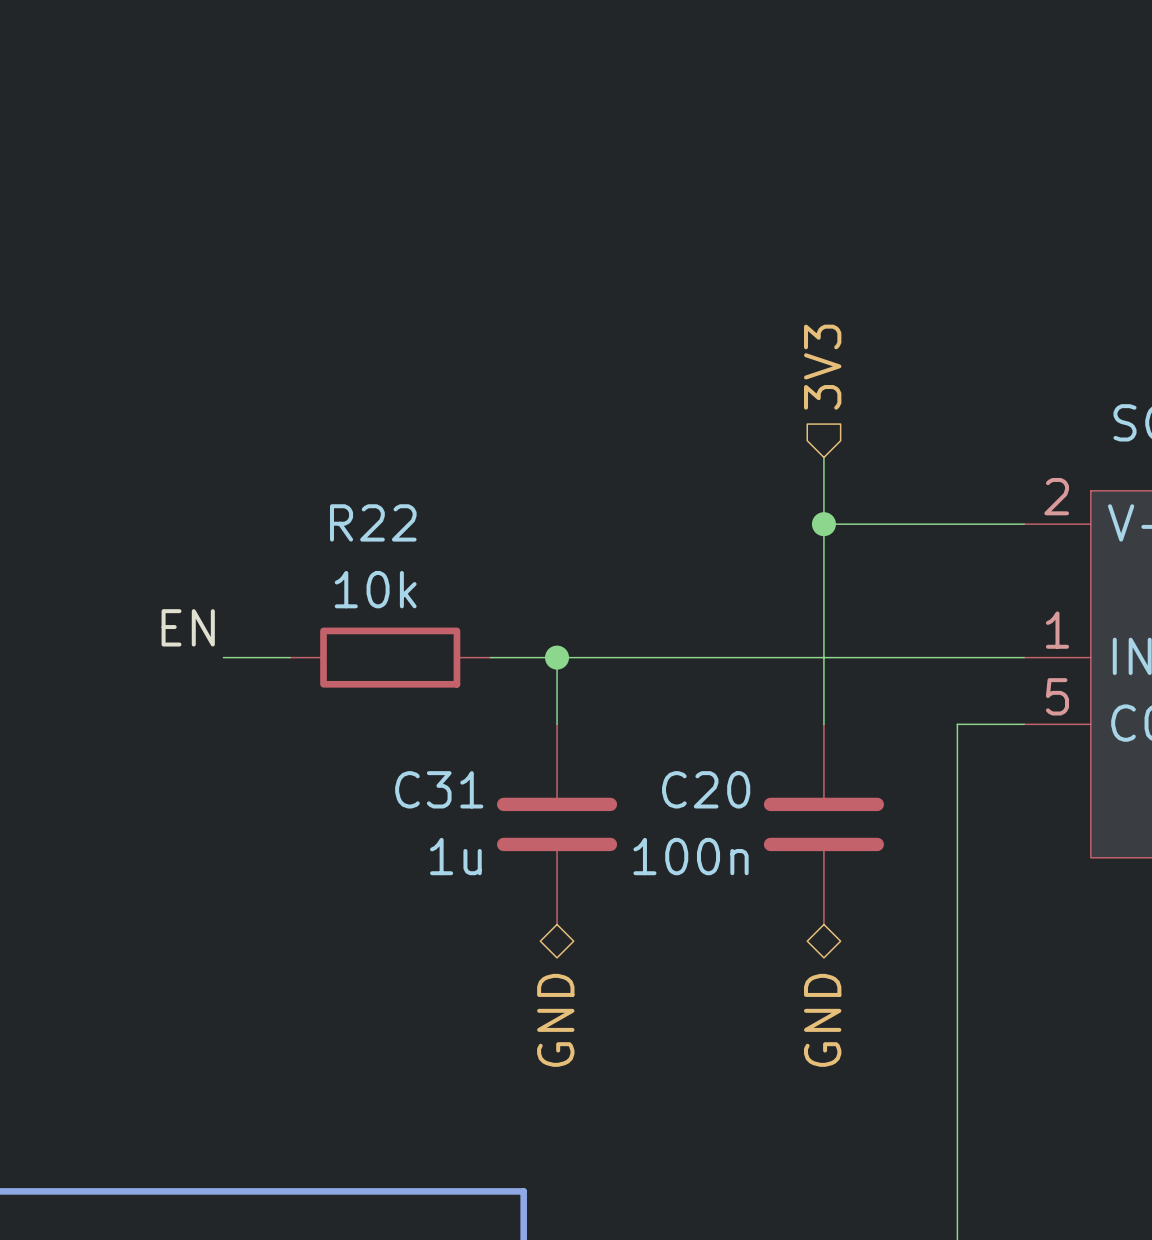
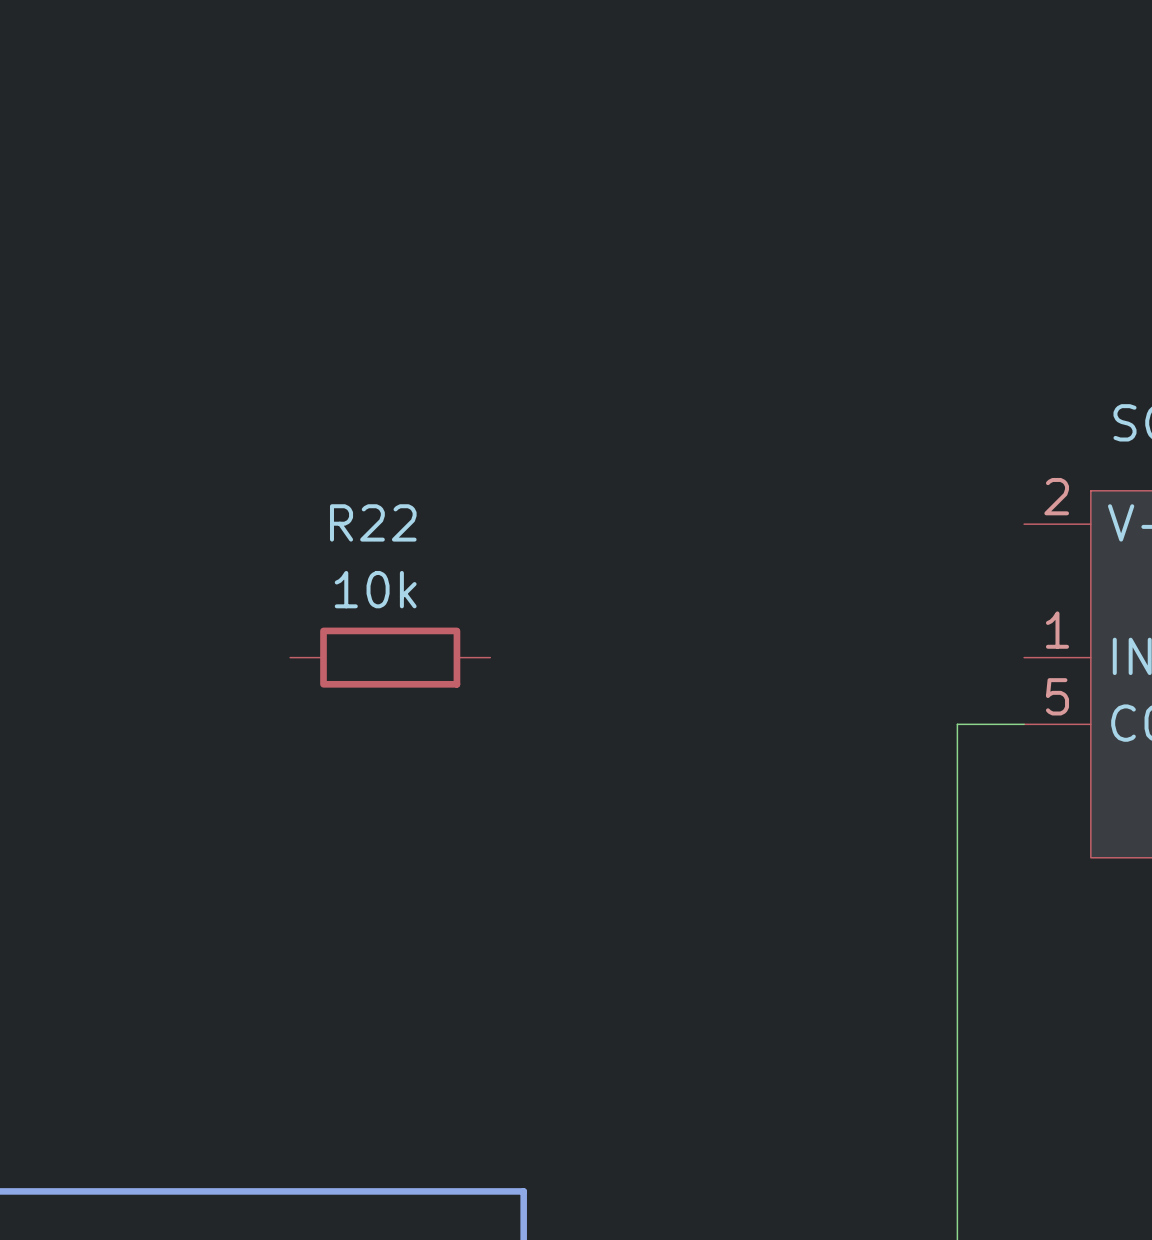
hierarchical label: 3V3 (822, 367) -> none
wire: (823, 457) (823, 724) -> none
wire: (823, 524) (1024, 524) -> none
junction: (823, 524) -> none
label: EN (188, 627) -> none
wire: (223, 657) (290, 657) -> none
wire: (490, 657) (1024, 657) -> none
wire: (557, 657) (557, 724) -> none
junction: (557, 657) -> none
C31: 1u (557, 824) -> none
C20: 100n (823, 824) -> none
hierarchical label: GND (555, 1020) -> none
hierarchical label: GND (822, 1020) -> none

